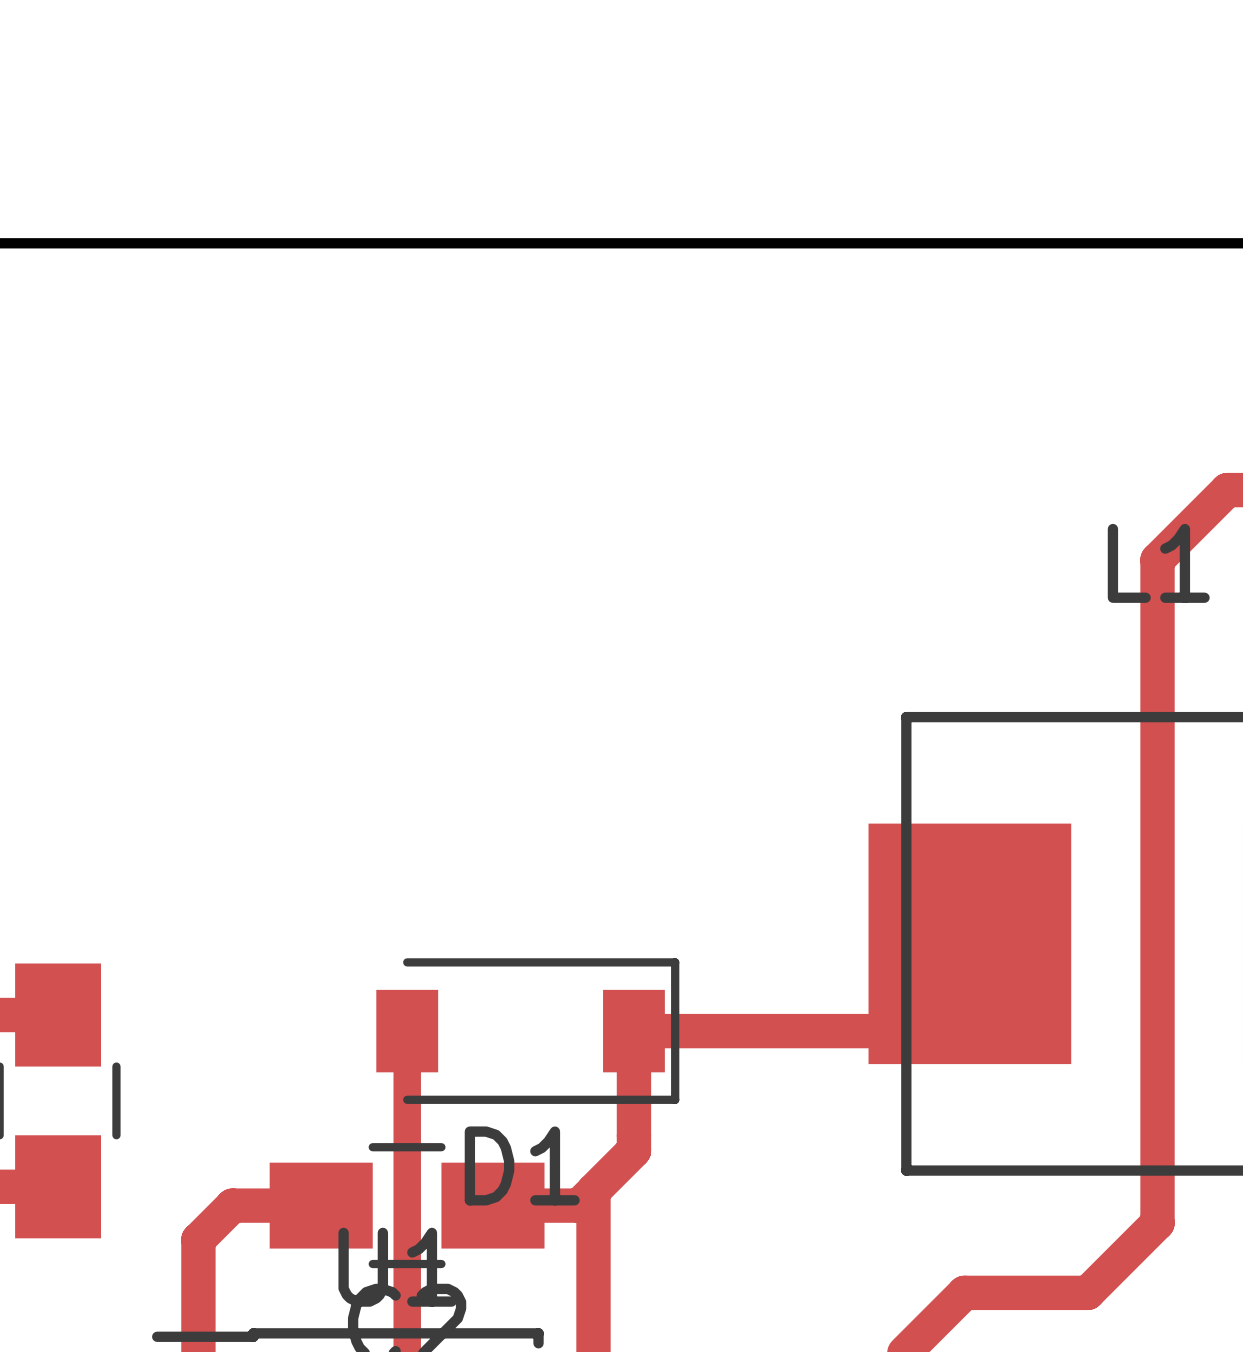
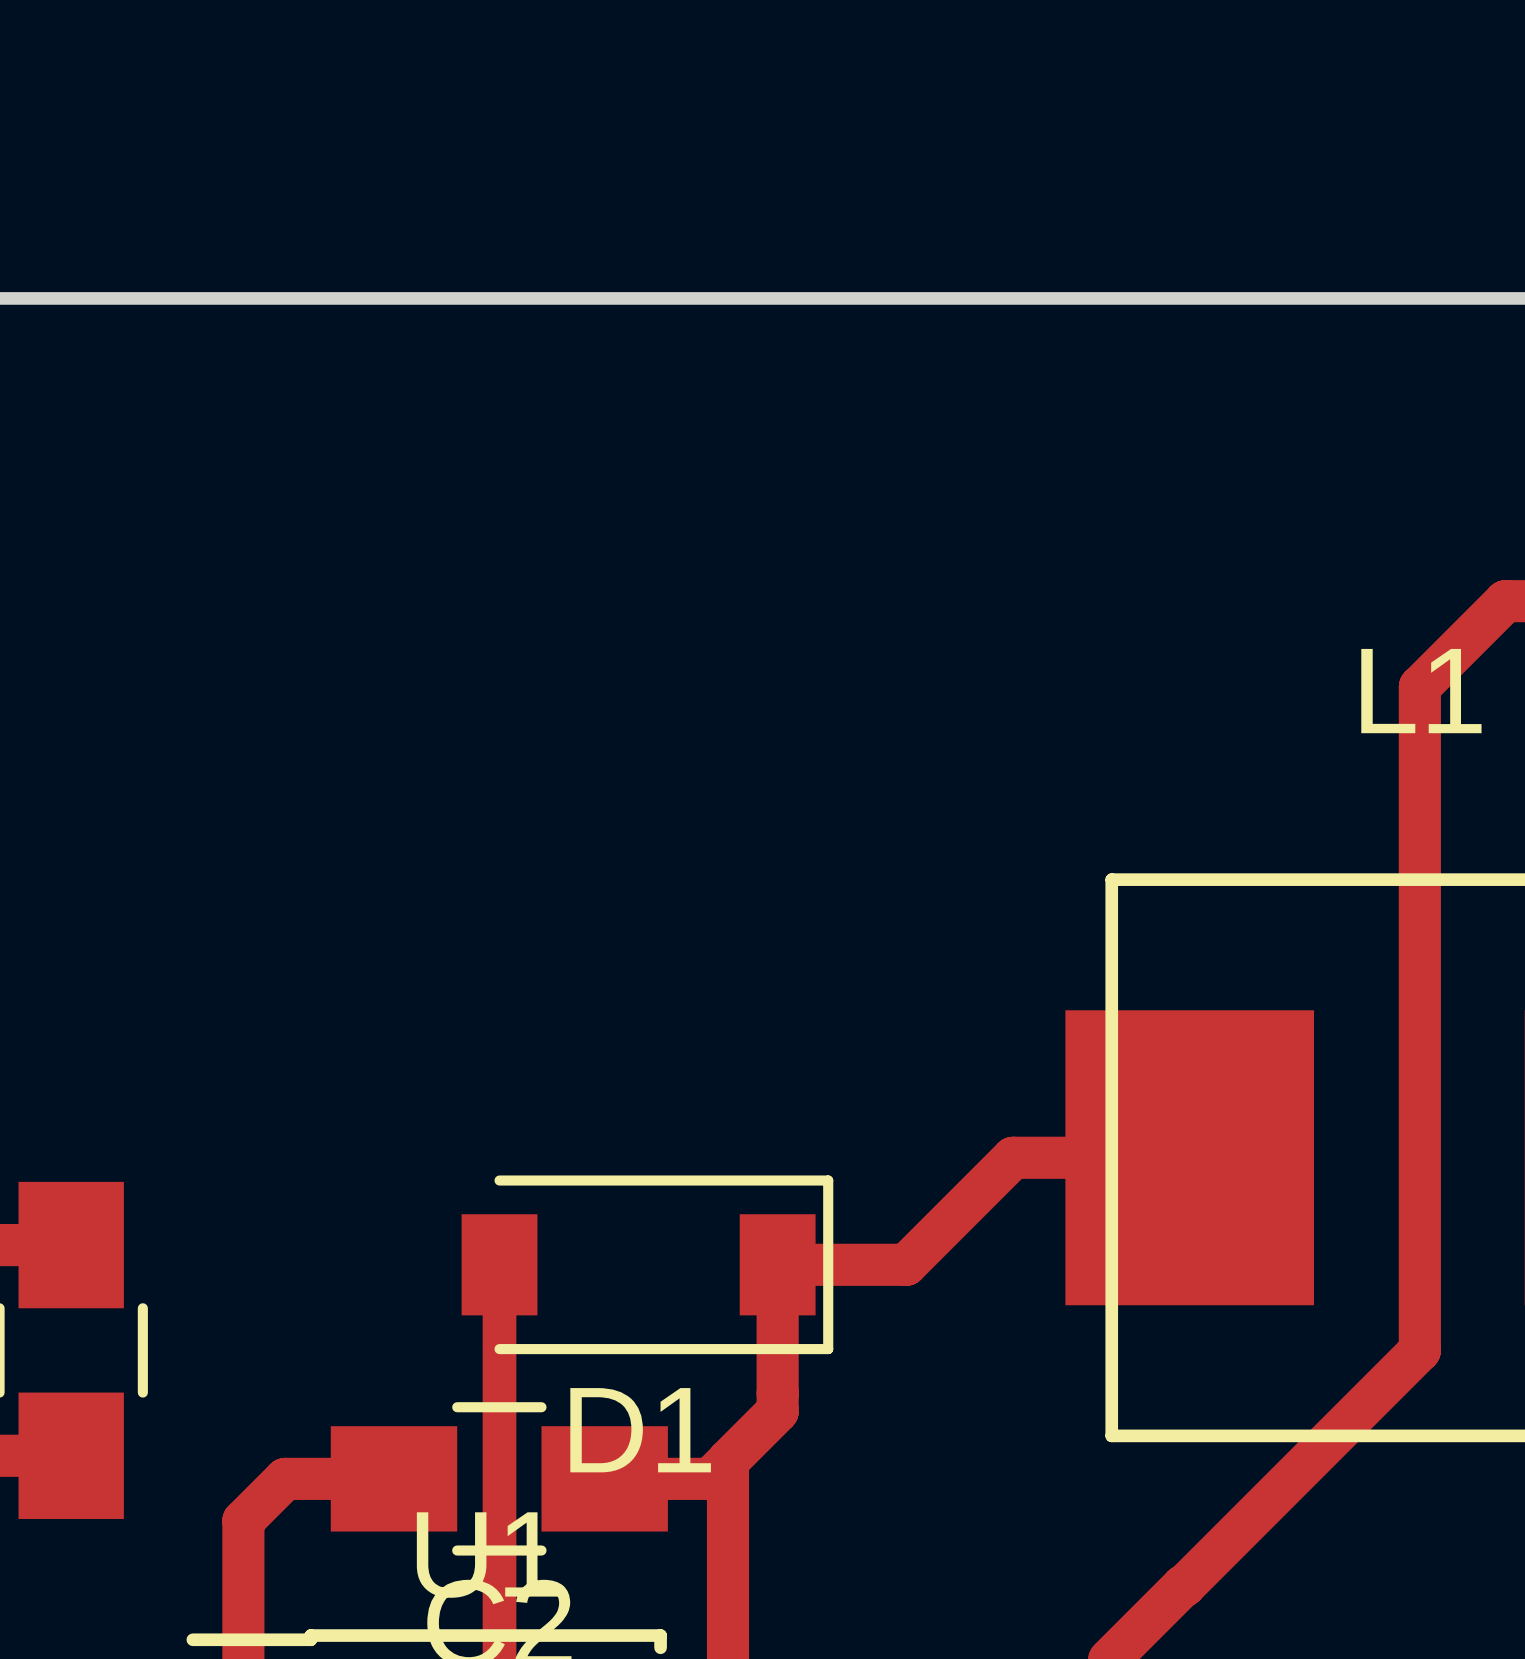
track: (964, 943) (877, 1031) (738, 1031) -> (1189, 1157) (1013, 1157) (906, 1264)
track: (1157, 1100) (1157, 1223) (1087, 1292) (965, 1292) -> (1419, 1350) (1184, 1585)

